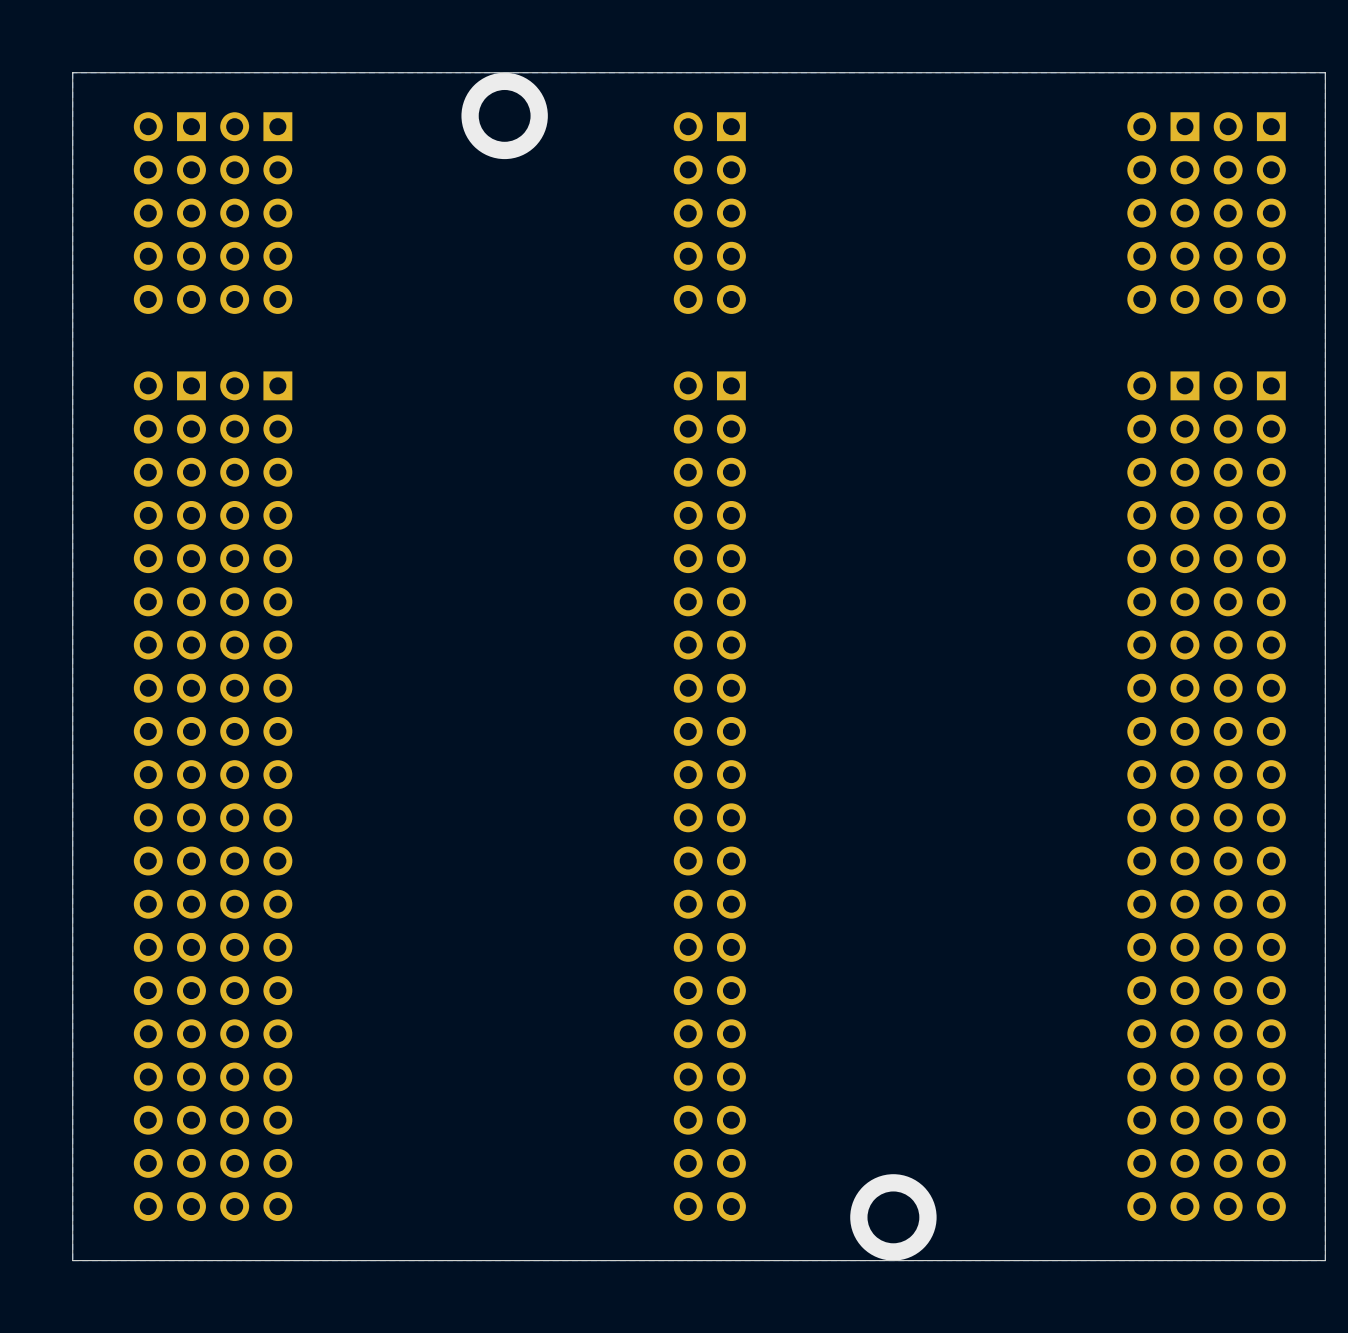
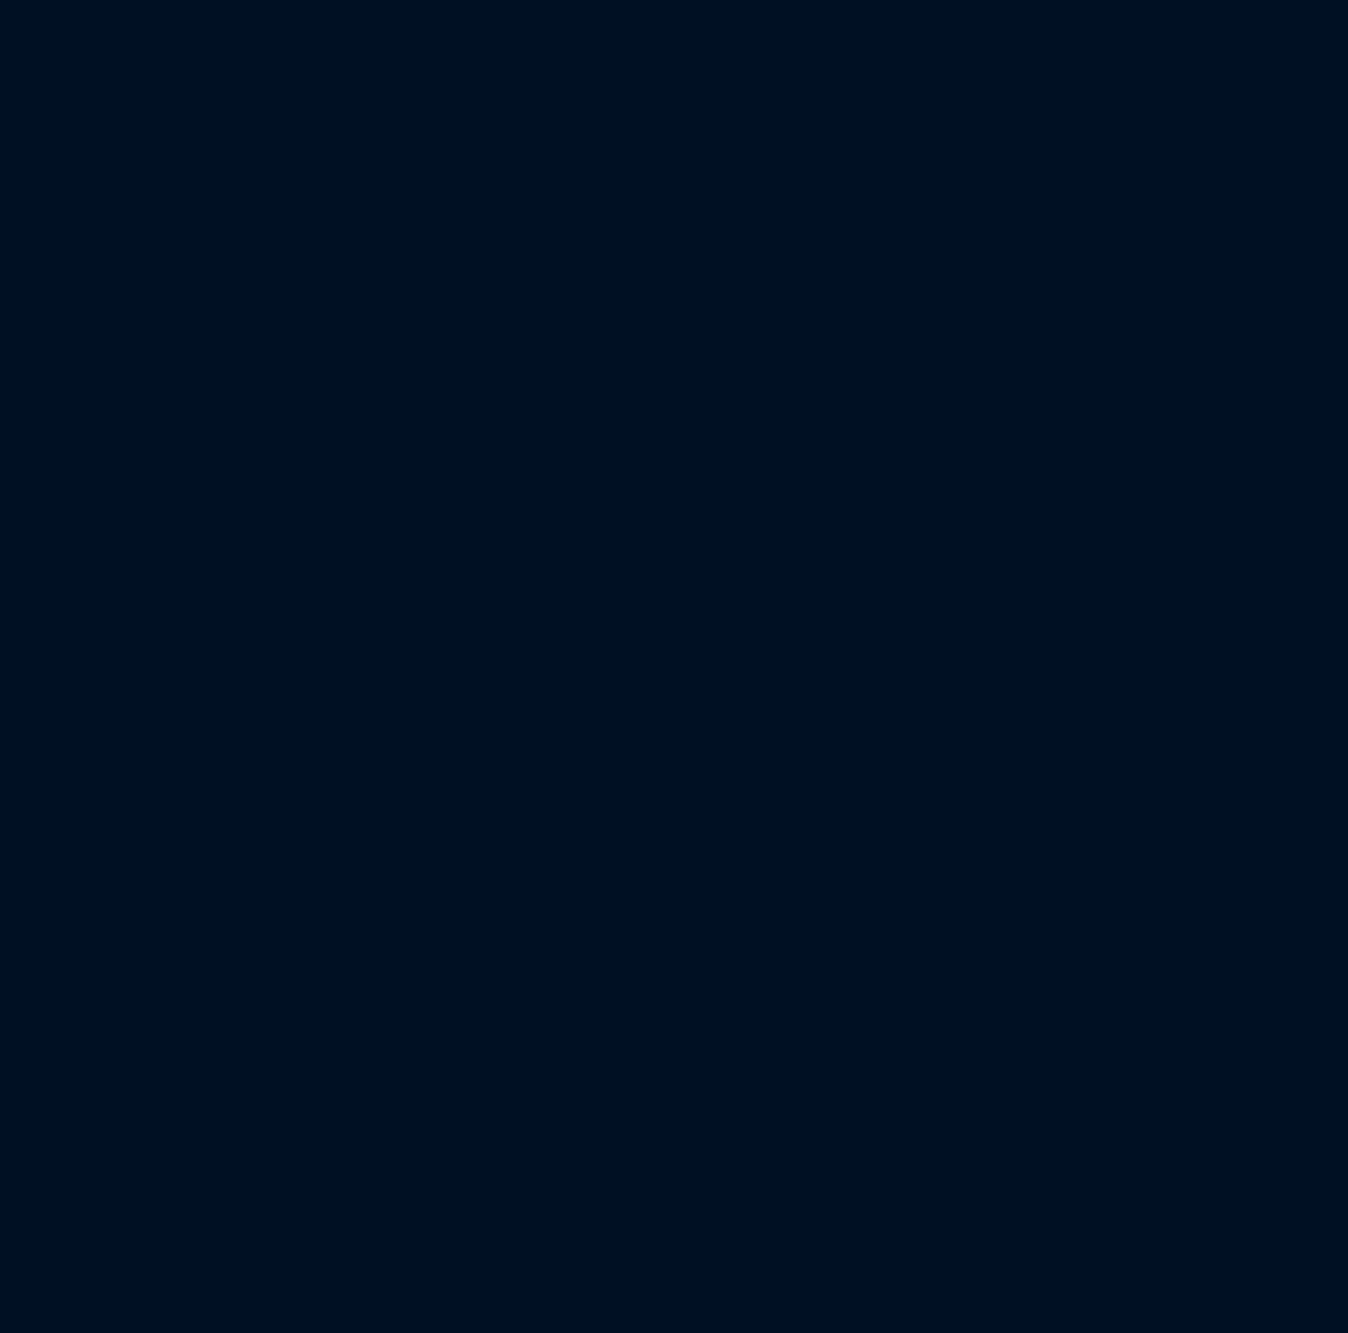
board edge: (1325, 72) (1325, 1260) (72, 1260) (72, 72) (1325, 72) -> none
via: (504, 115) -> none
part: (169, 213) -> none
part: (256, 213) -> none
part: (709, 213) -> none
part: (1163, 213) -> none
part: (1249, 213) -> none
part: (169, 796) -> none
part: (256, 796) -> none
part: (709, 796) -> none
part: (1163, 796) -> none
part: (1249, 796) -> none
via: (893, 1217) -> none

